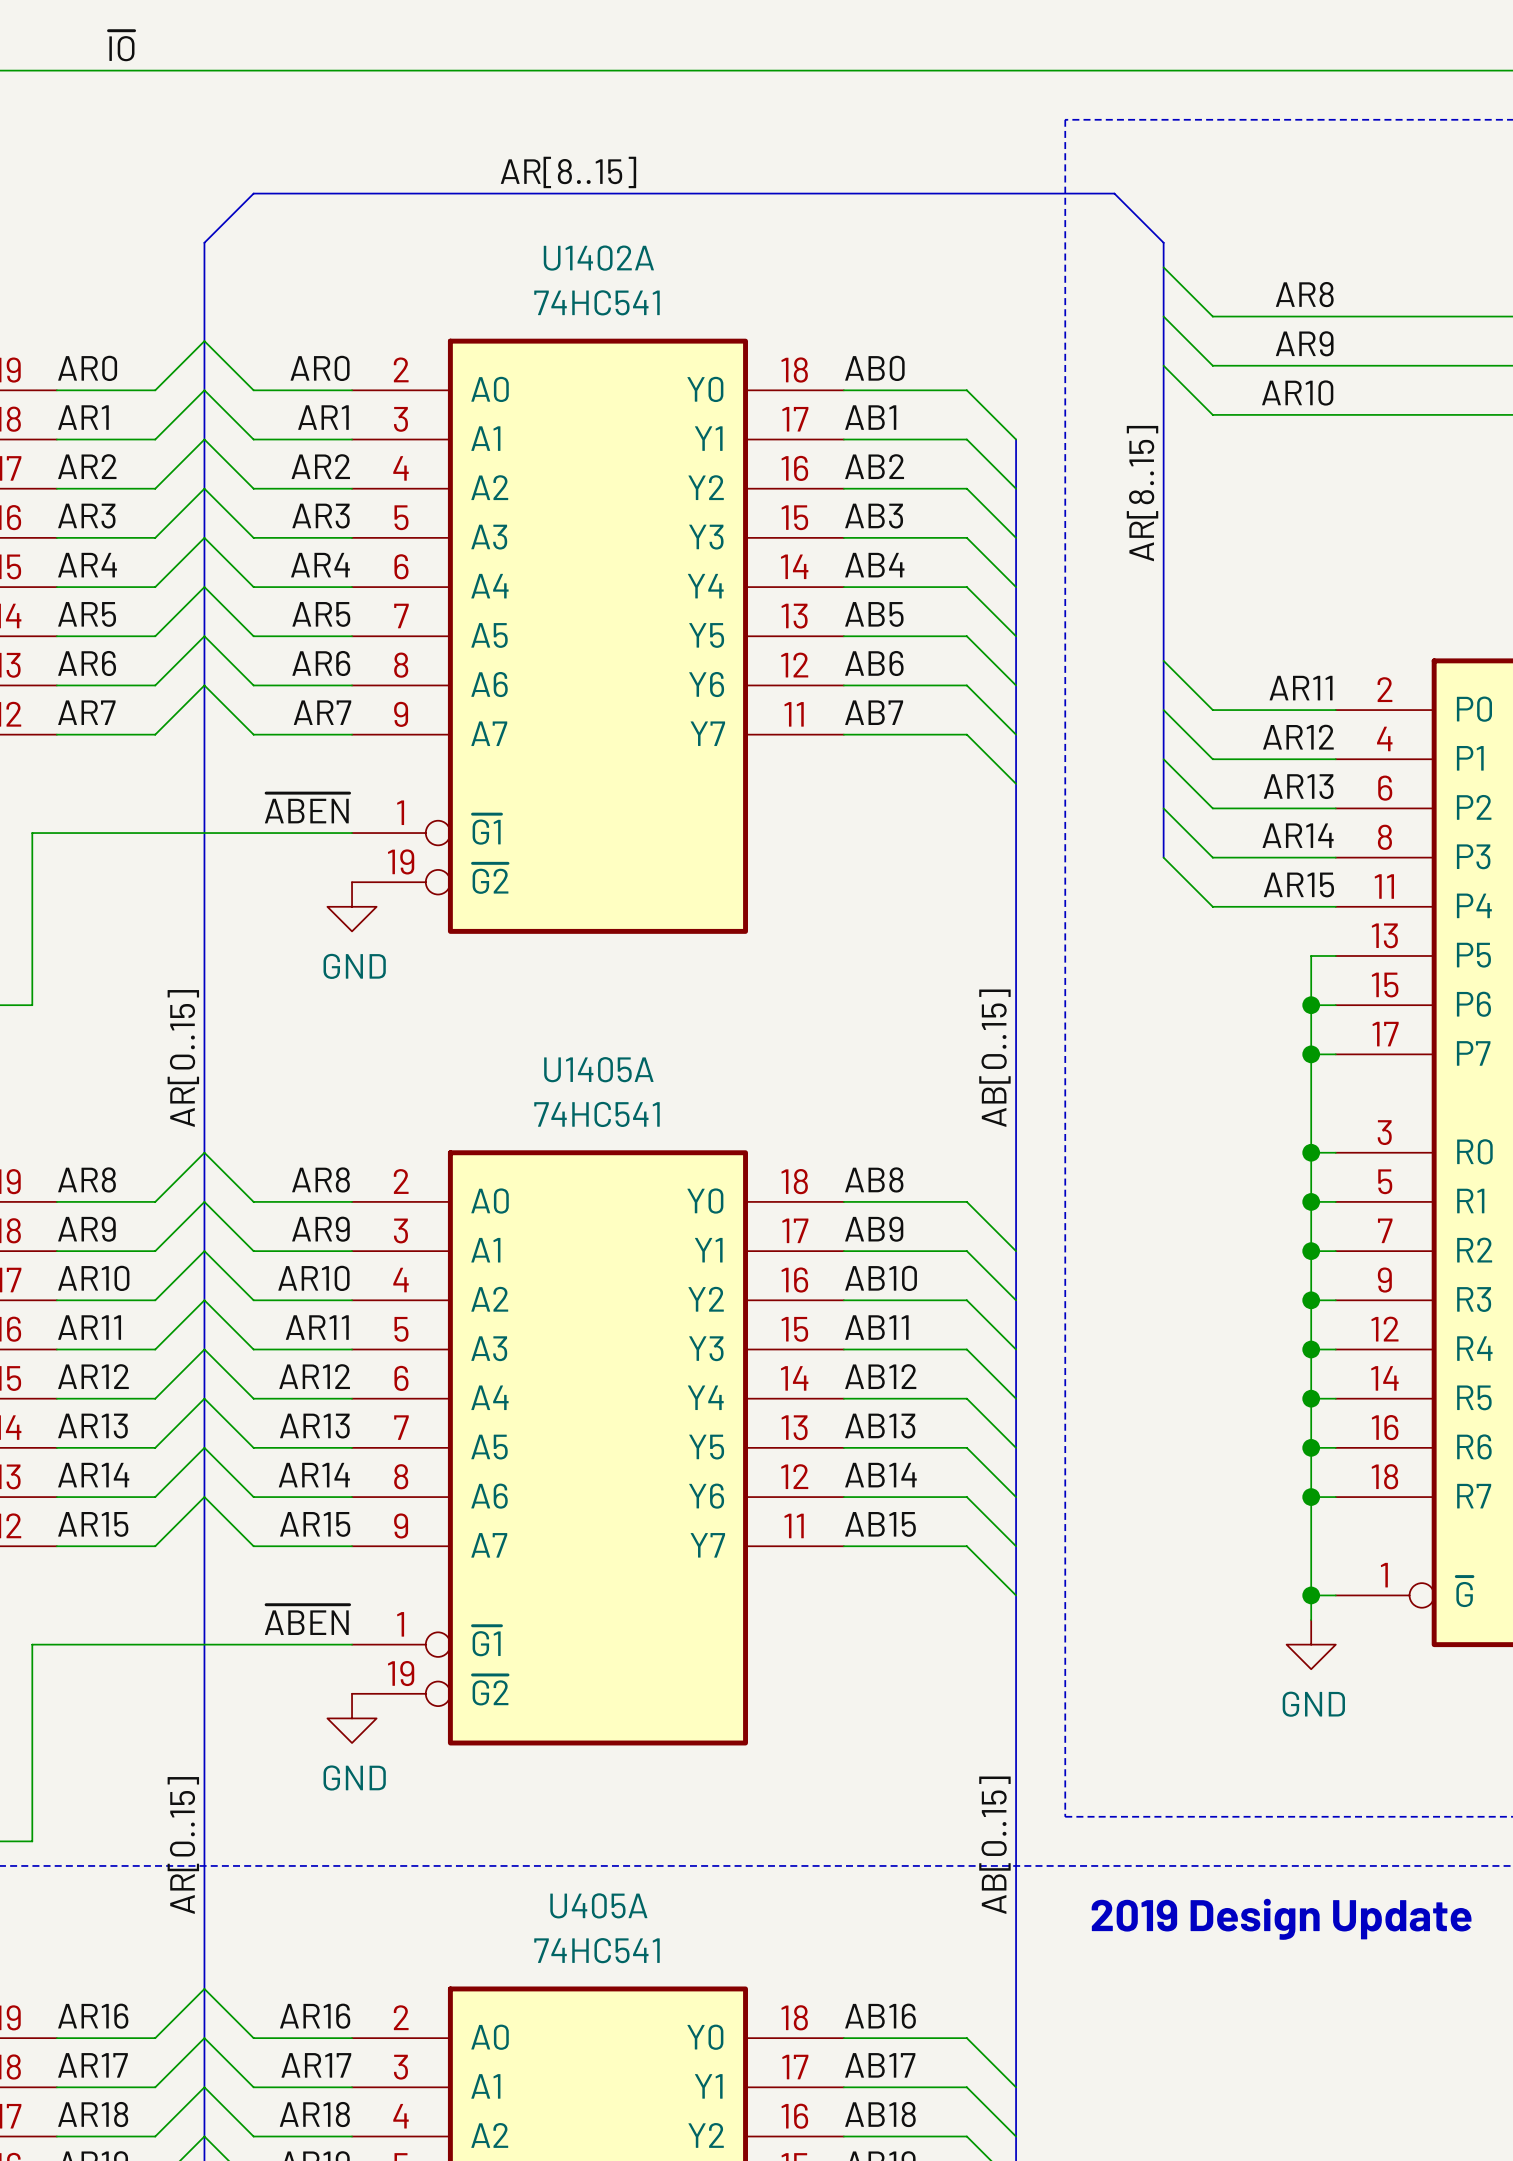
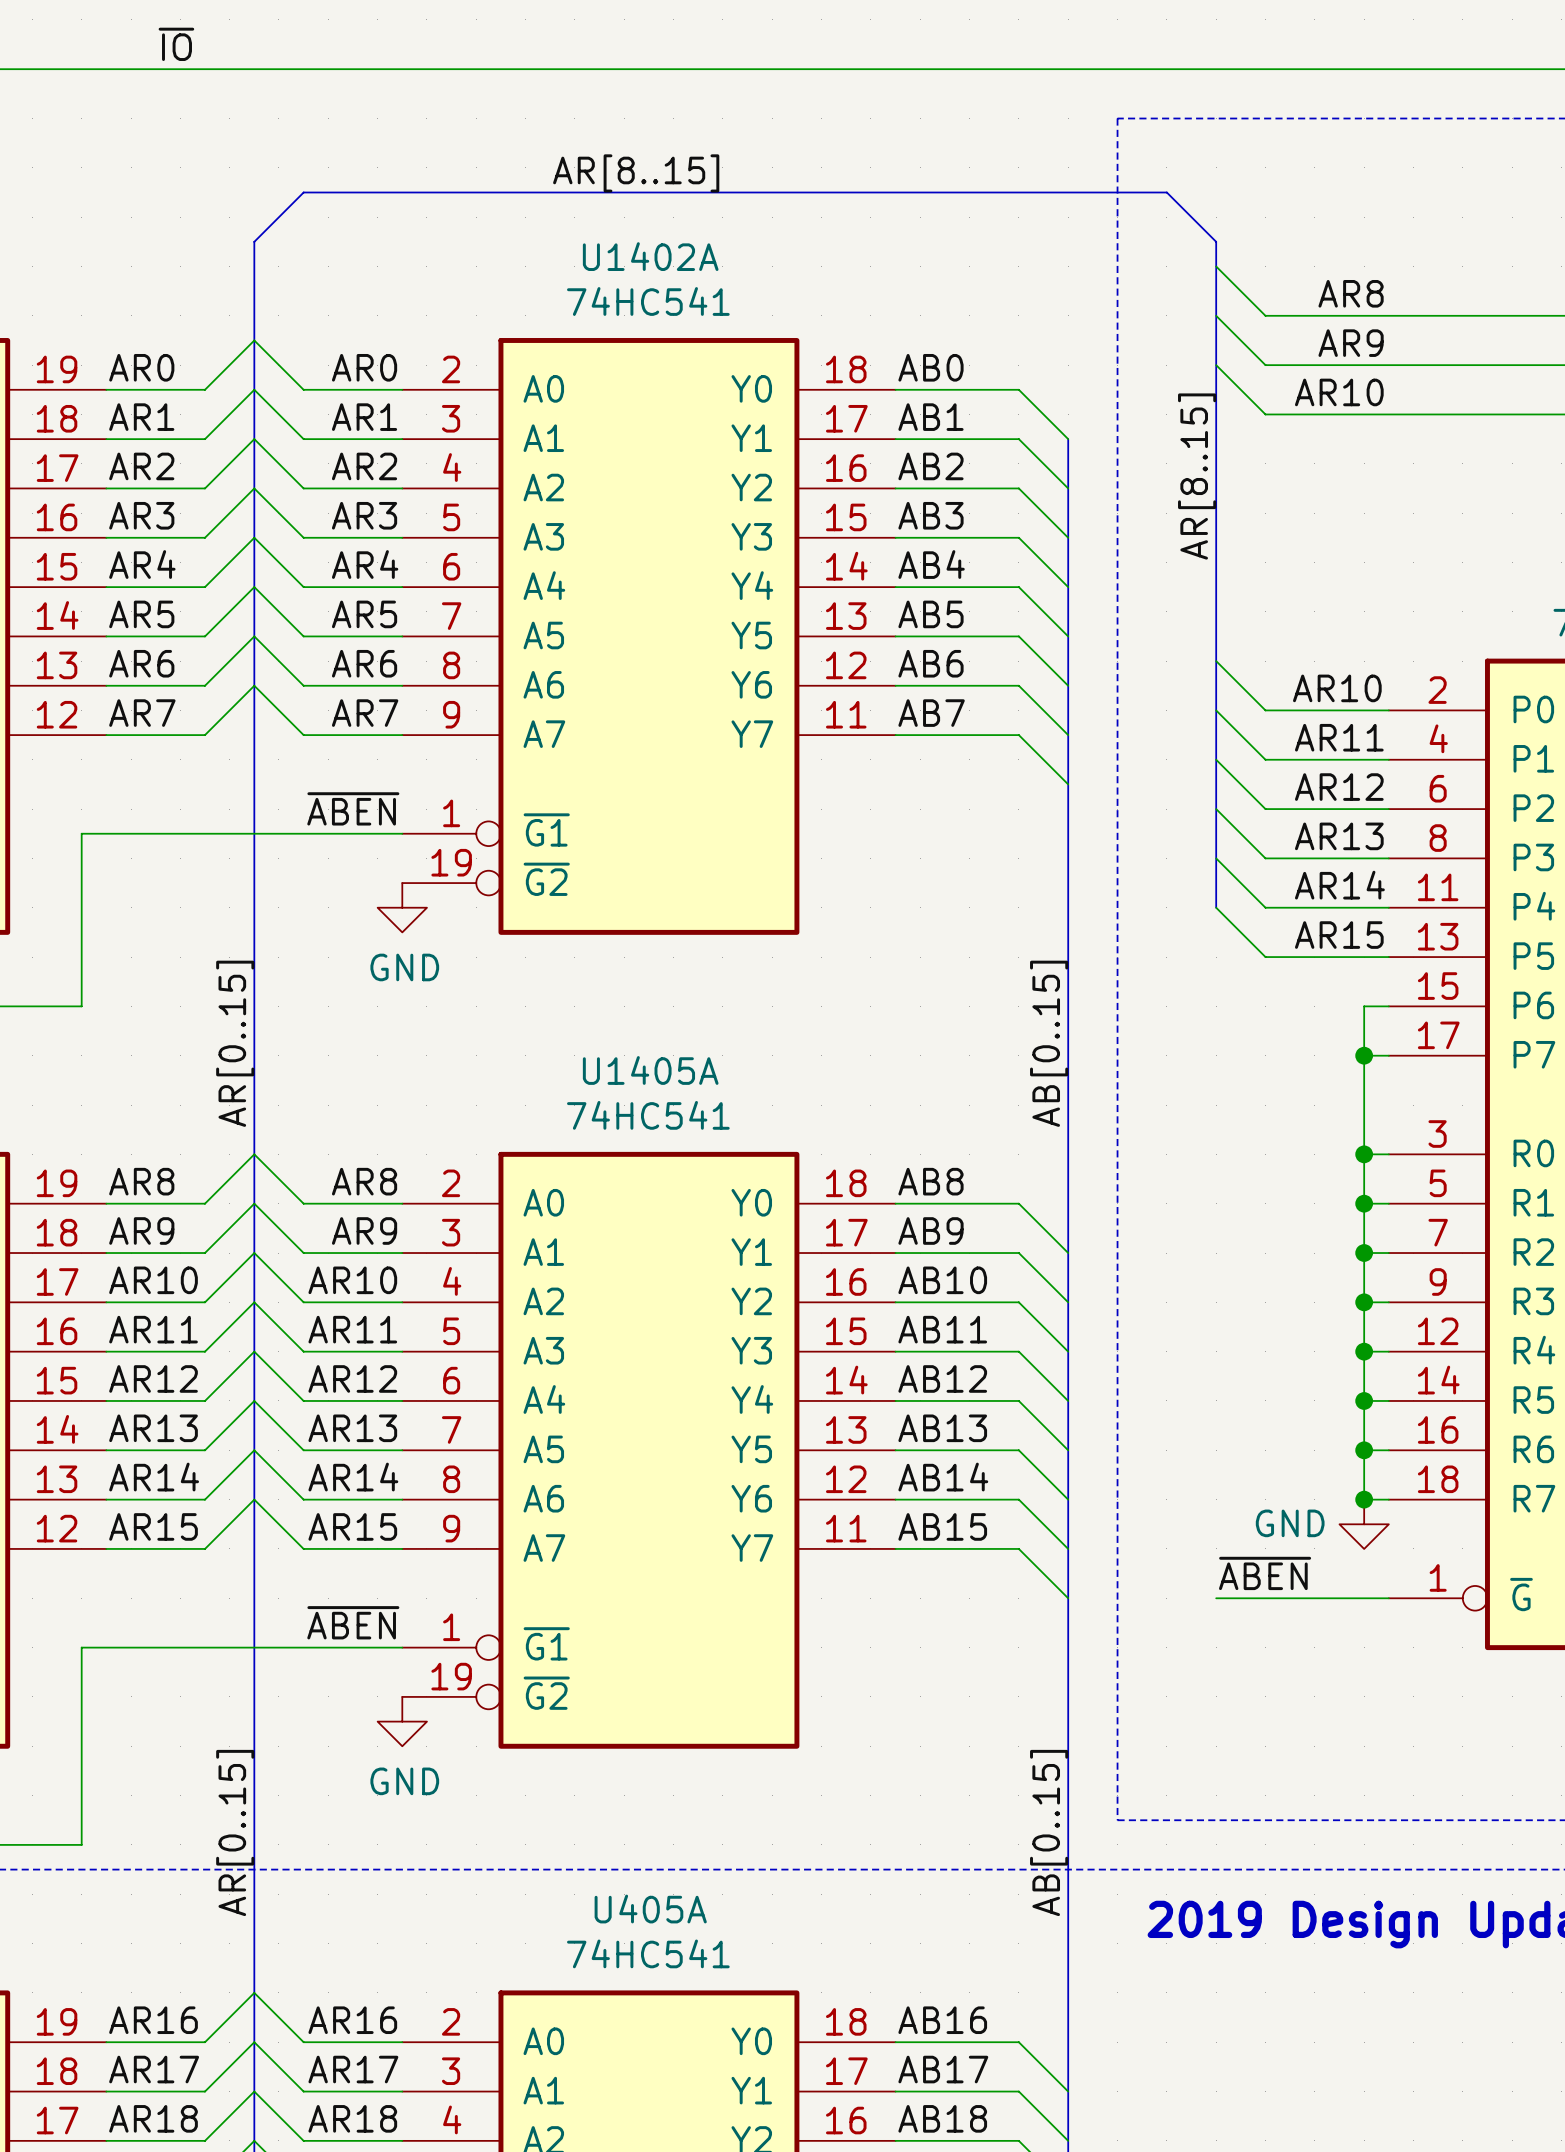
label: AR11 (1301, 688) -> AR10 (1337, 688)
label: AR12 (1298, 737) -> AR11 (1339, 737)
label: AR13 (1298, 786) -> AR12 (1339, 787)
label: AR14 (1298, 835) -> AR13 (1339, 836)
bus: none -> (1216, 858) (1216, 907)
label: AR15 (1298, 884) -> AR14 (1339, 885)
label: none -> AR15 (1339, 935)
wire: (1311, 955) (1311, 1005) -> (1364, 957) (1265, 957) (1216, 907)
junction: (1311, 1005) -> none
wire: (1311, 1497) (1311, 1620) -> none
label: none -> ~{ABEN} (1265, 1573)
wire: none -> (1216, 1598) (1364, 1598)
junction: (1311, 1595) -> none
power symbol position: GND (1311, 1644) -> GND (1364, 1524)
power symbol text position: GND (1313, 1704) -> GND (1290, 1523)

